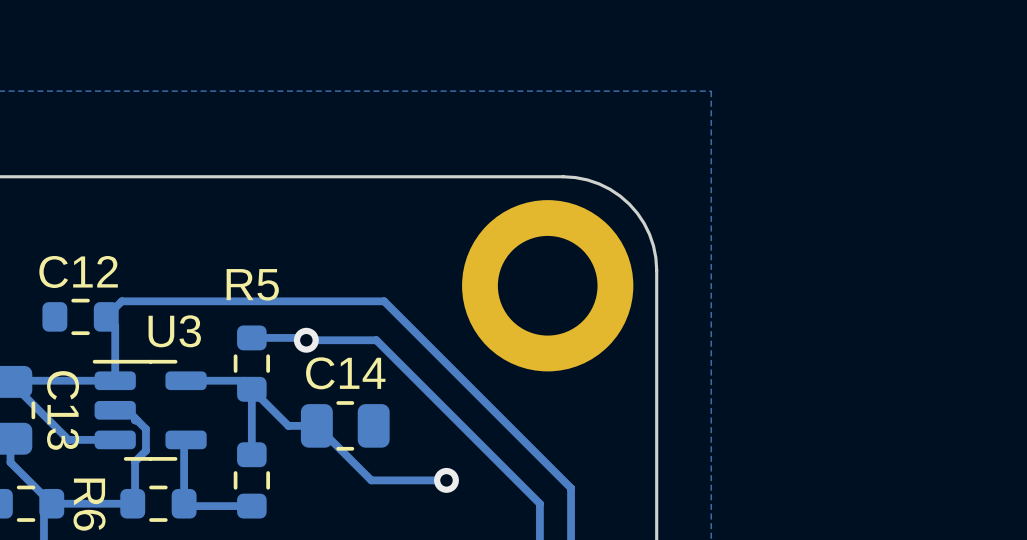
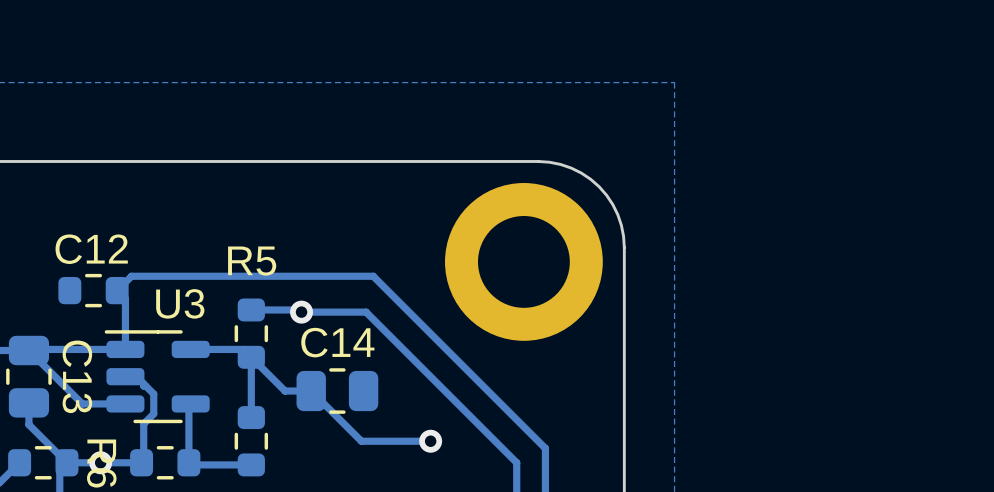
via: none -> (100, 462)

